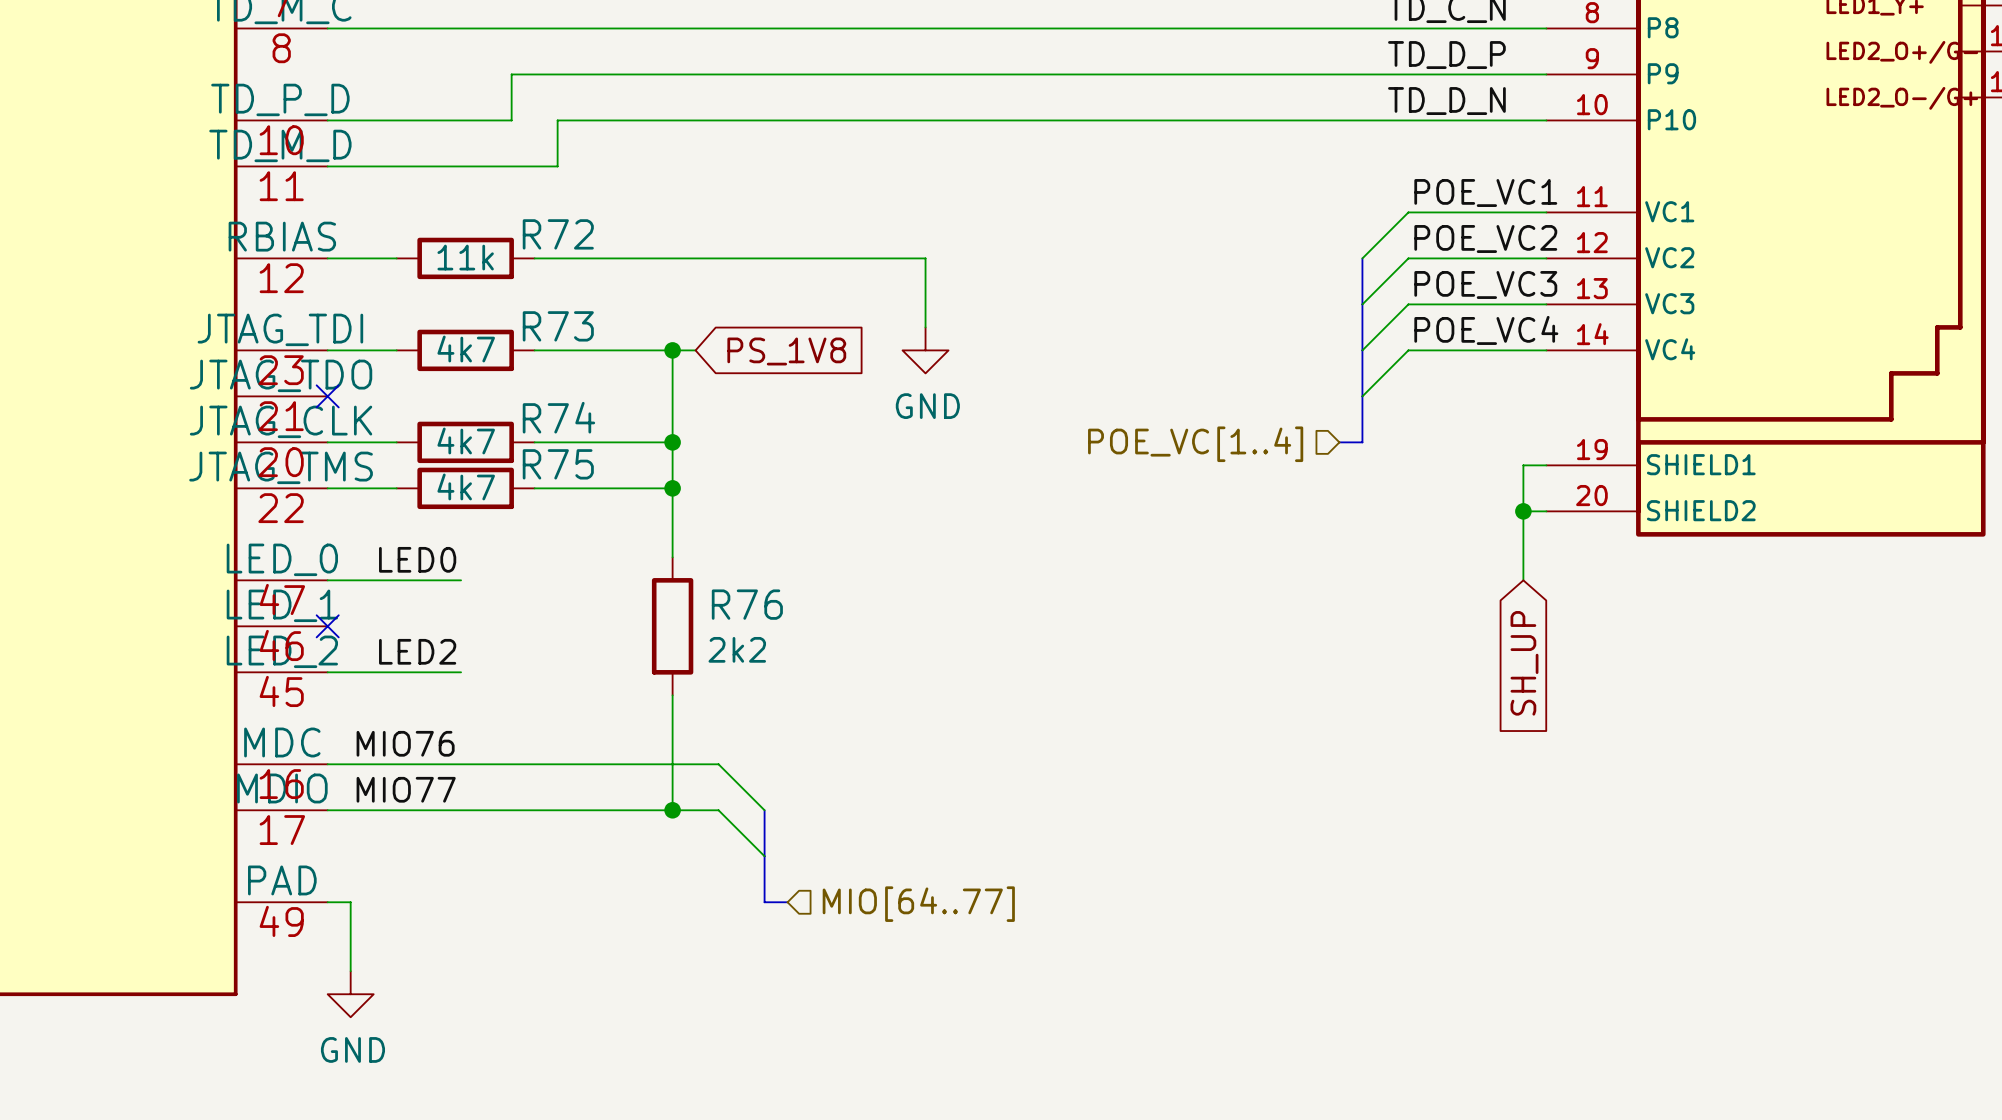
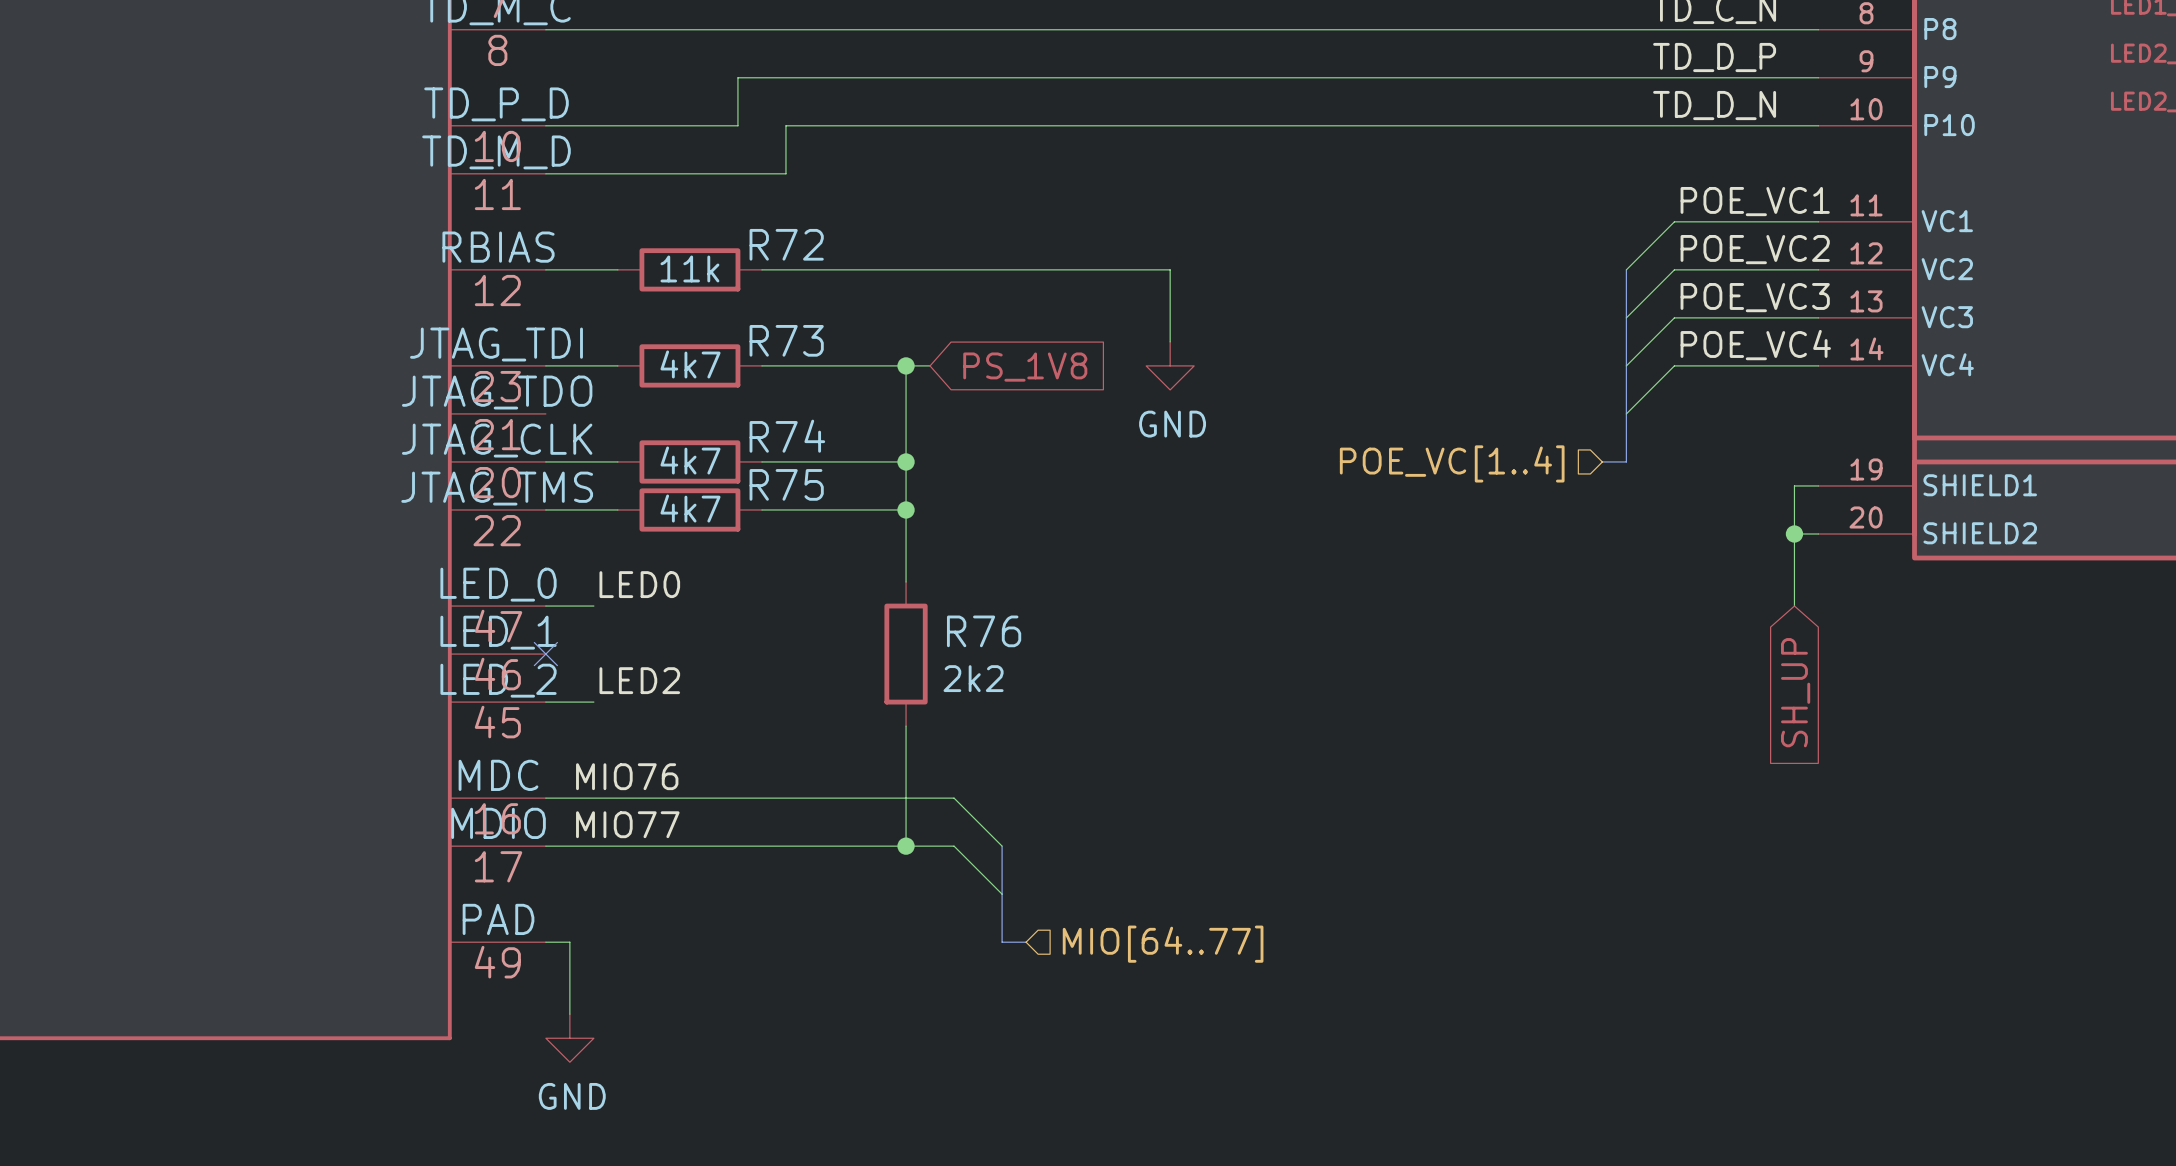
no-connect mark: (327, 396) -> none
wire: (373, 580) (461, 580) -> none
wire: (373, 672) (461, 672) -> none

